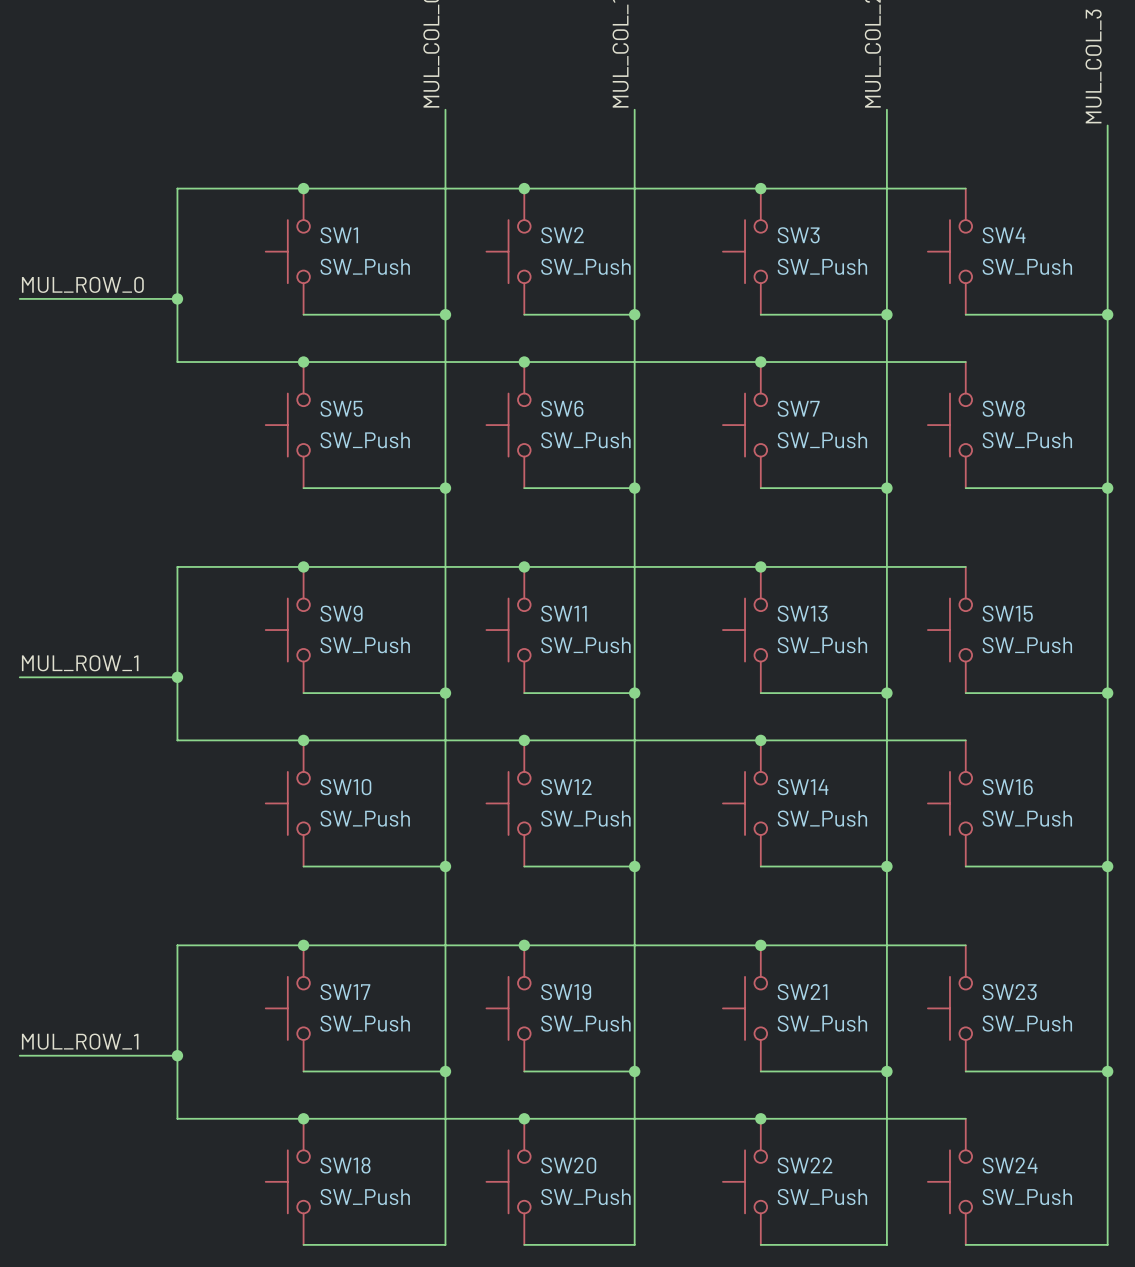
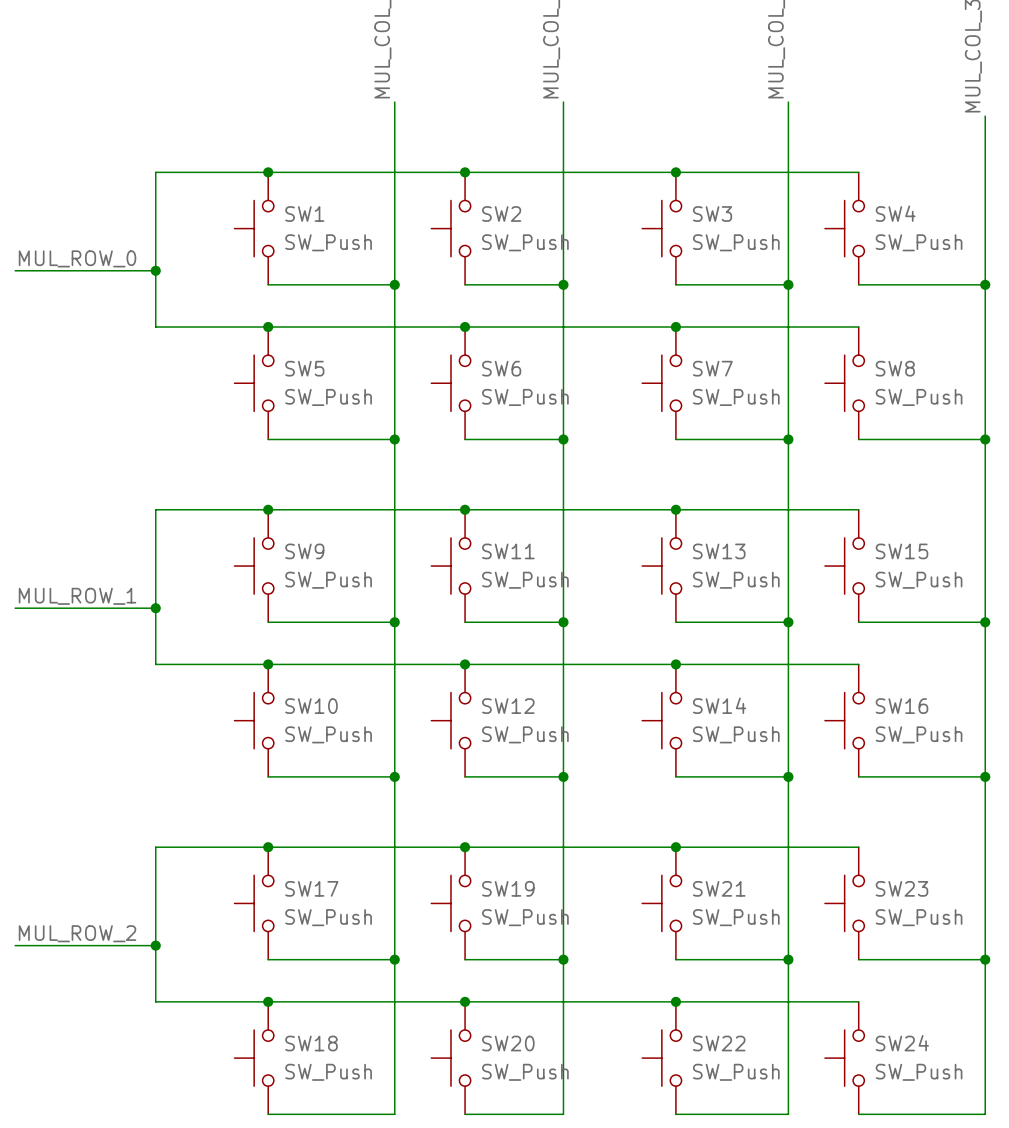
label: MUL_ROW_1 (80, 1041) -> MUL_ROW_2 (77, 933)

